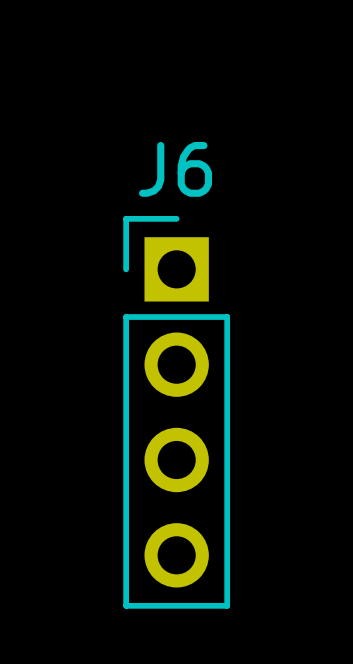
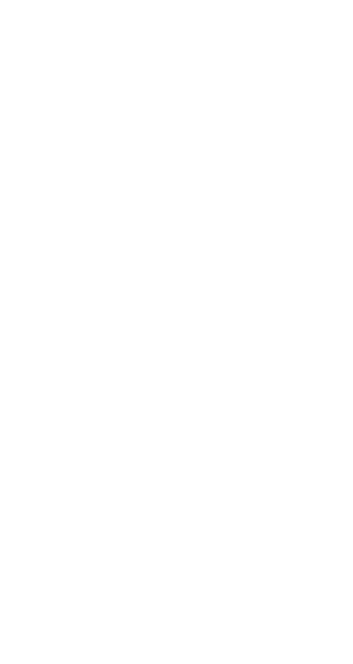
J6: (176, 412) -> none

